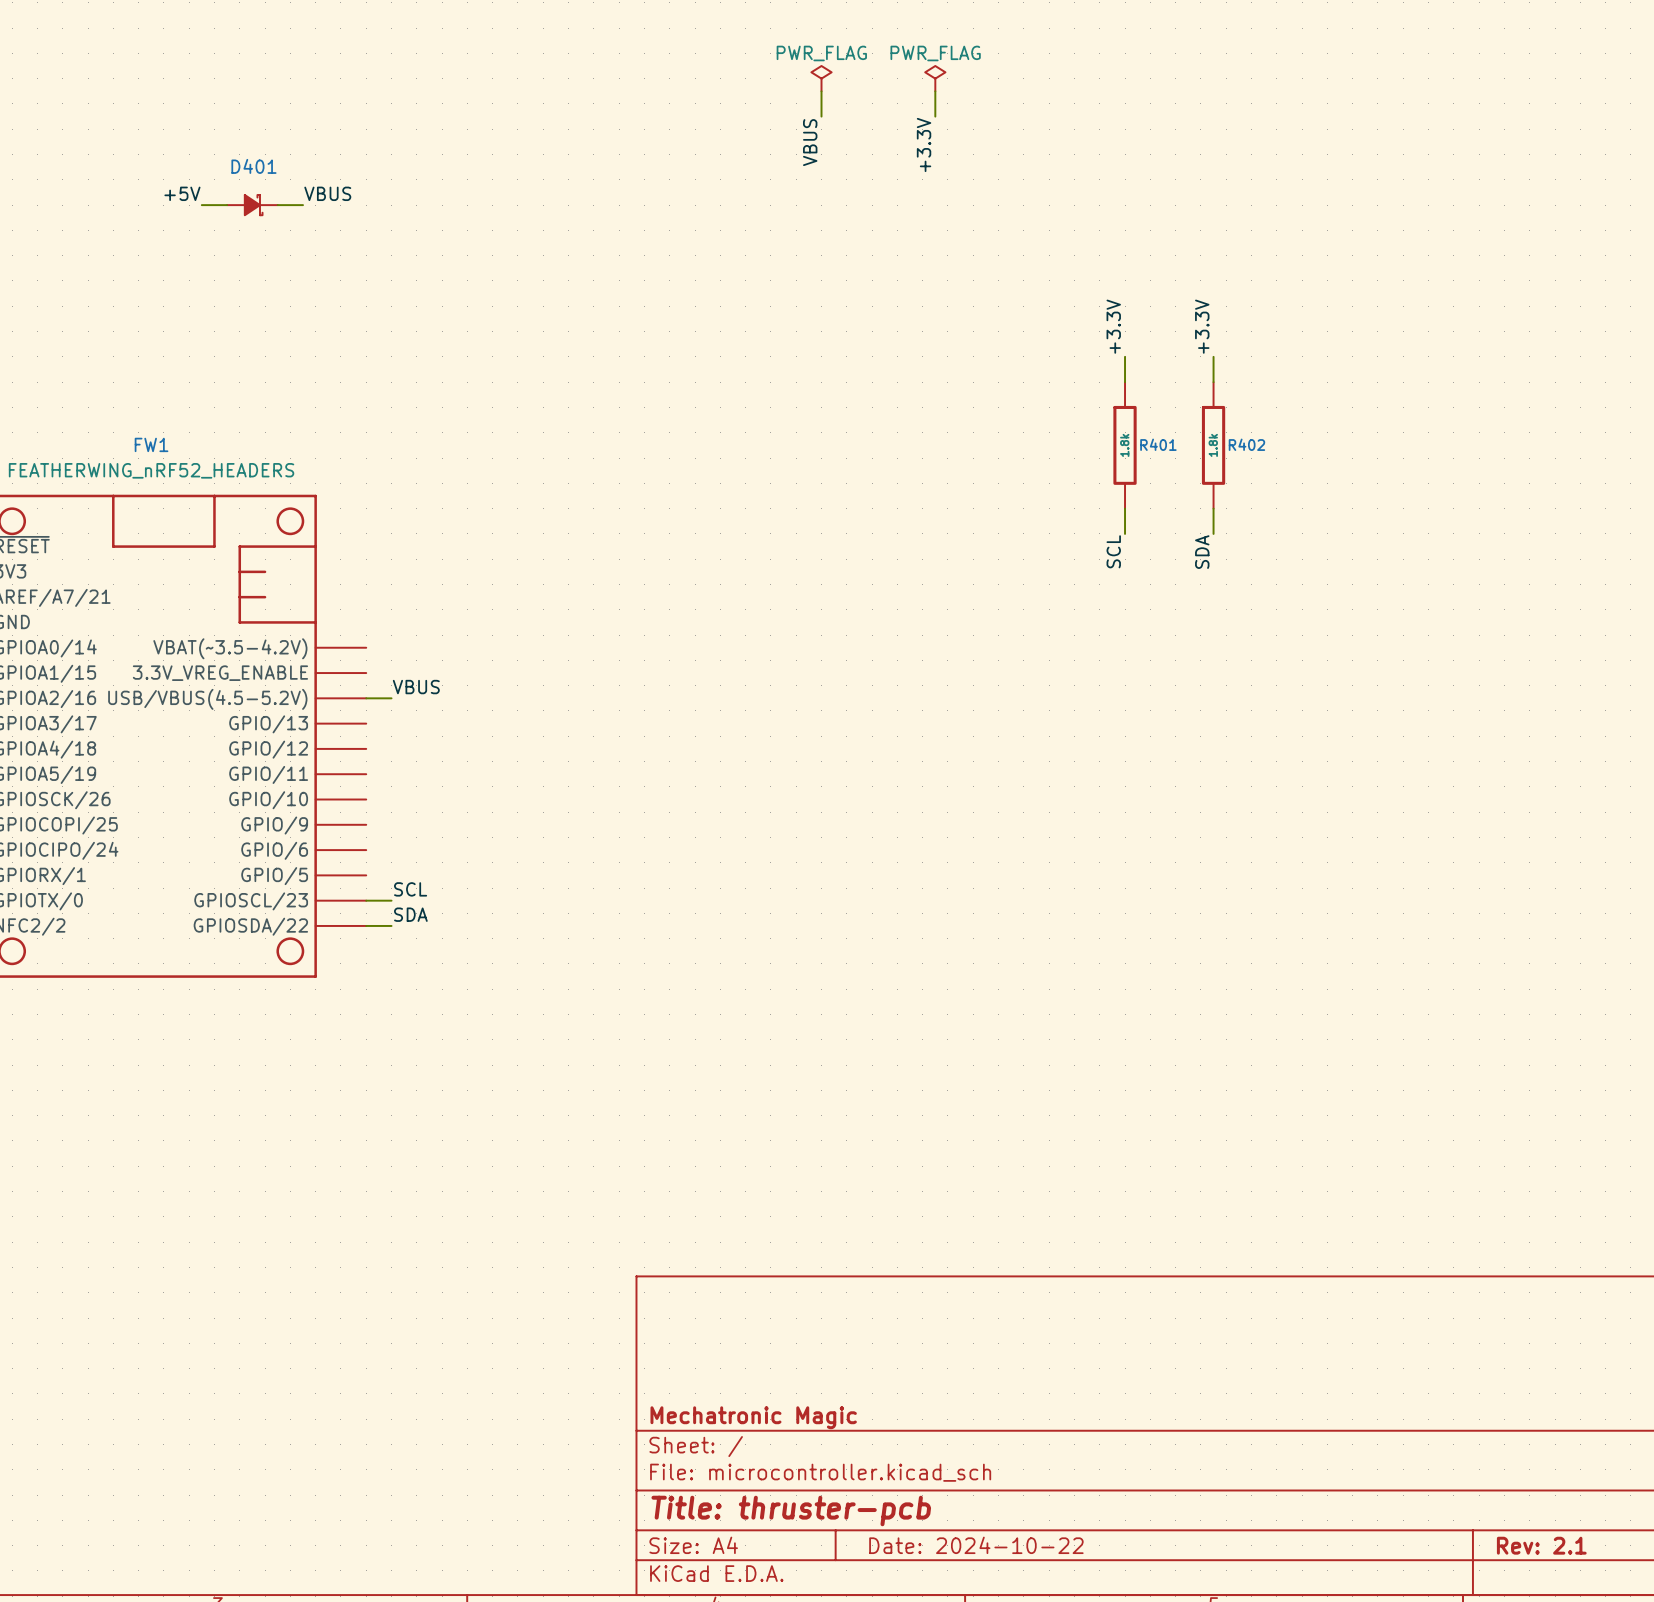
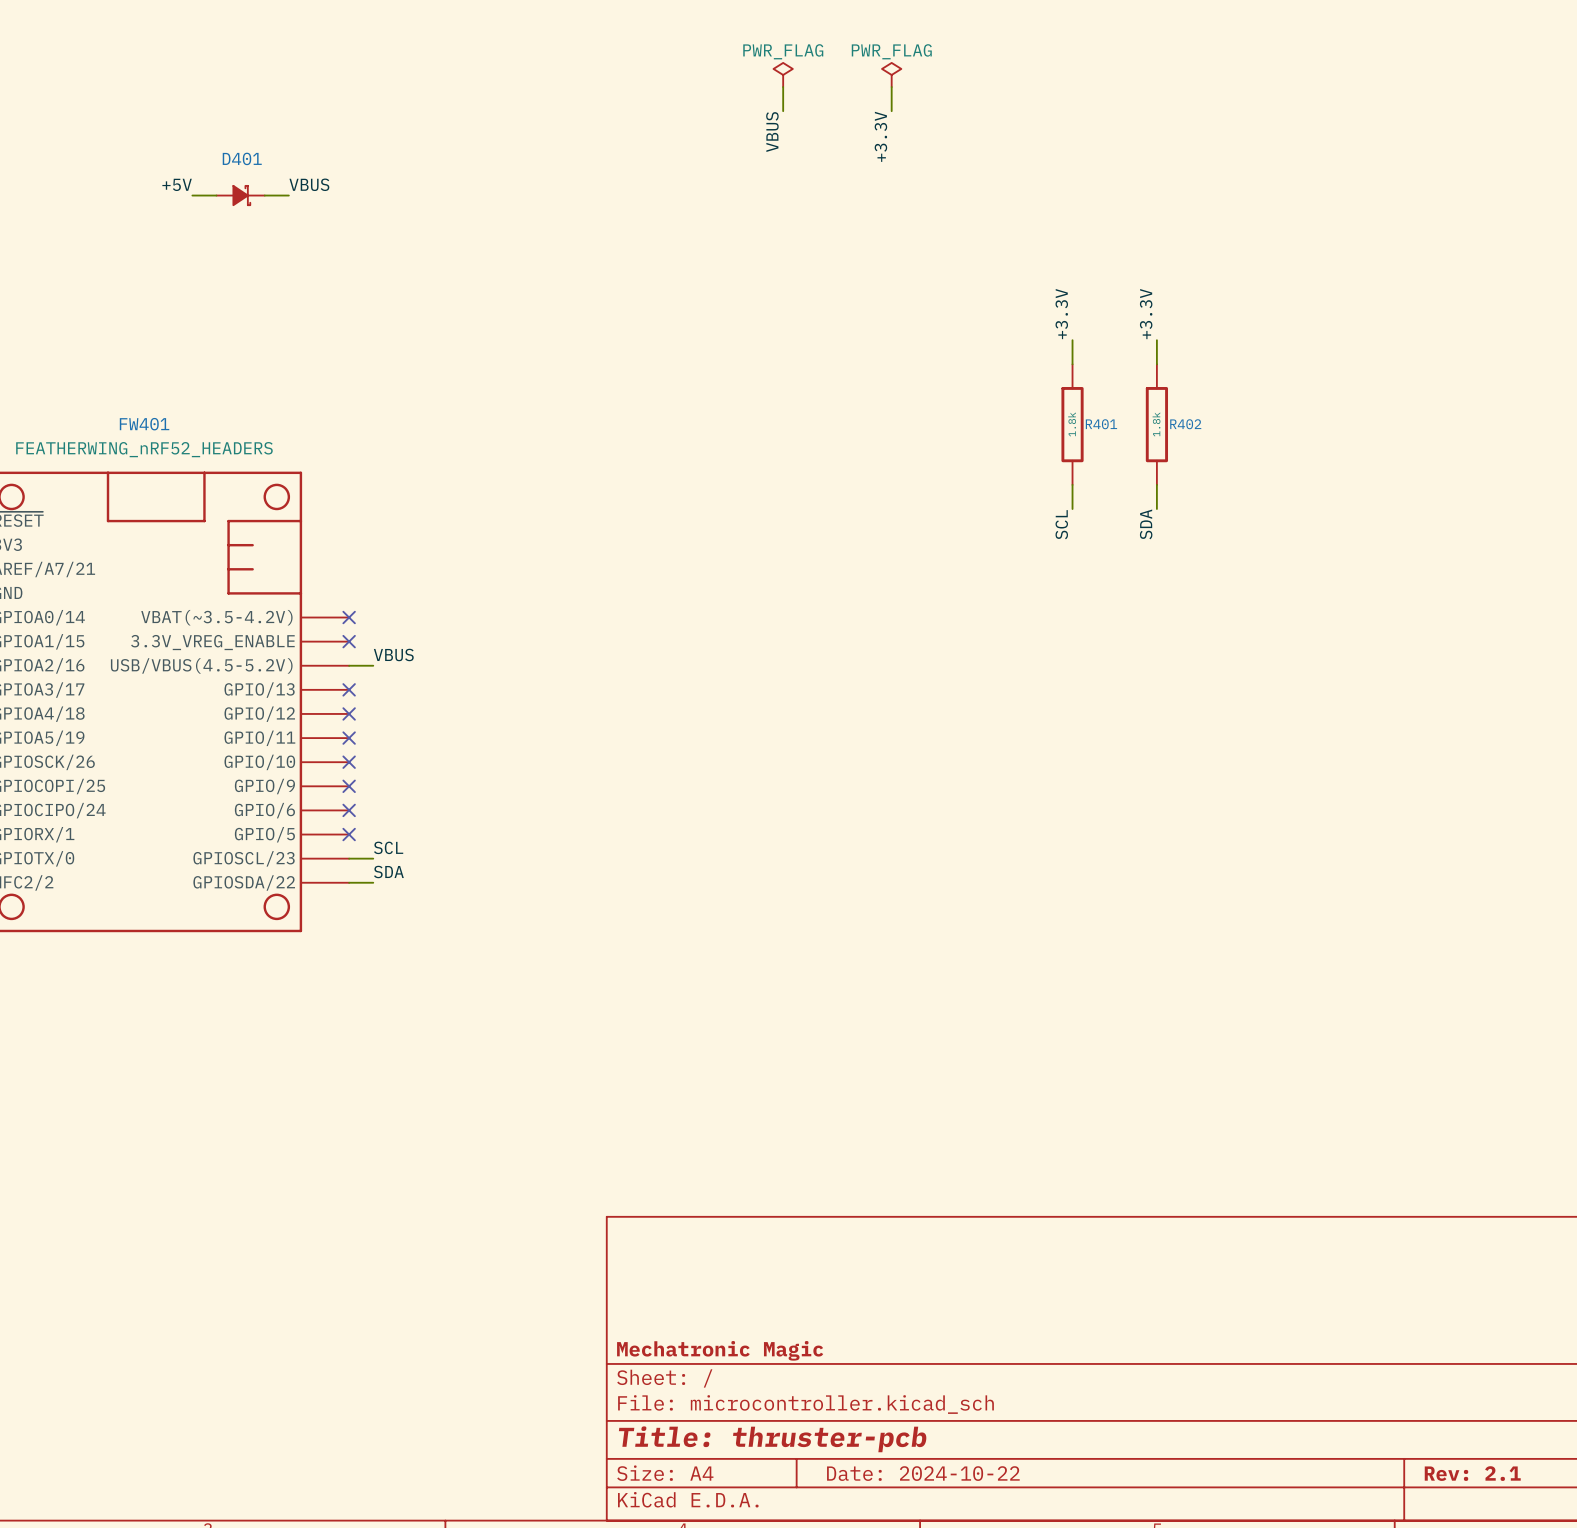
FW1 name: FW1 (151, 444) -> FW401 (144, 424)
no-connect mark: none -> (349, 617)
no-connect mark: none -> (349, 641)
no-connect mark: none -> (349, 689)
no-connect mark: none -> (349, 713)
no-connect mark: none -> (349, 738)
no-connect mark: none -> (349, 762)
no-connect mark: none -> (349, 786)
no-connect mark: none -> (349, 810)
no-connect mark: none -> (349, 834)

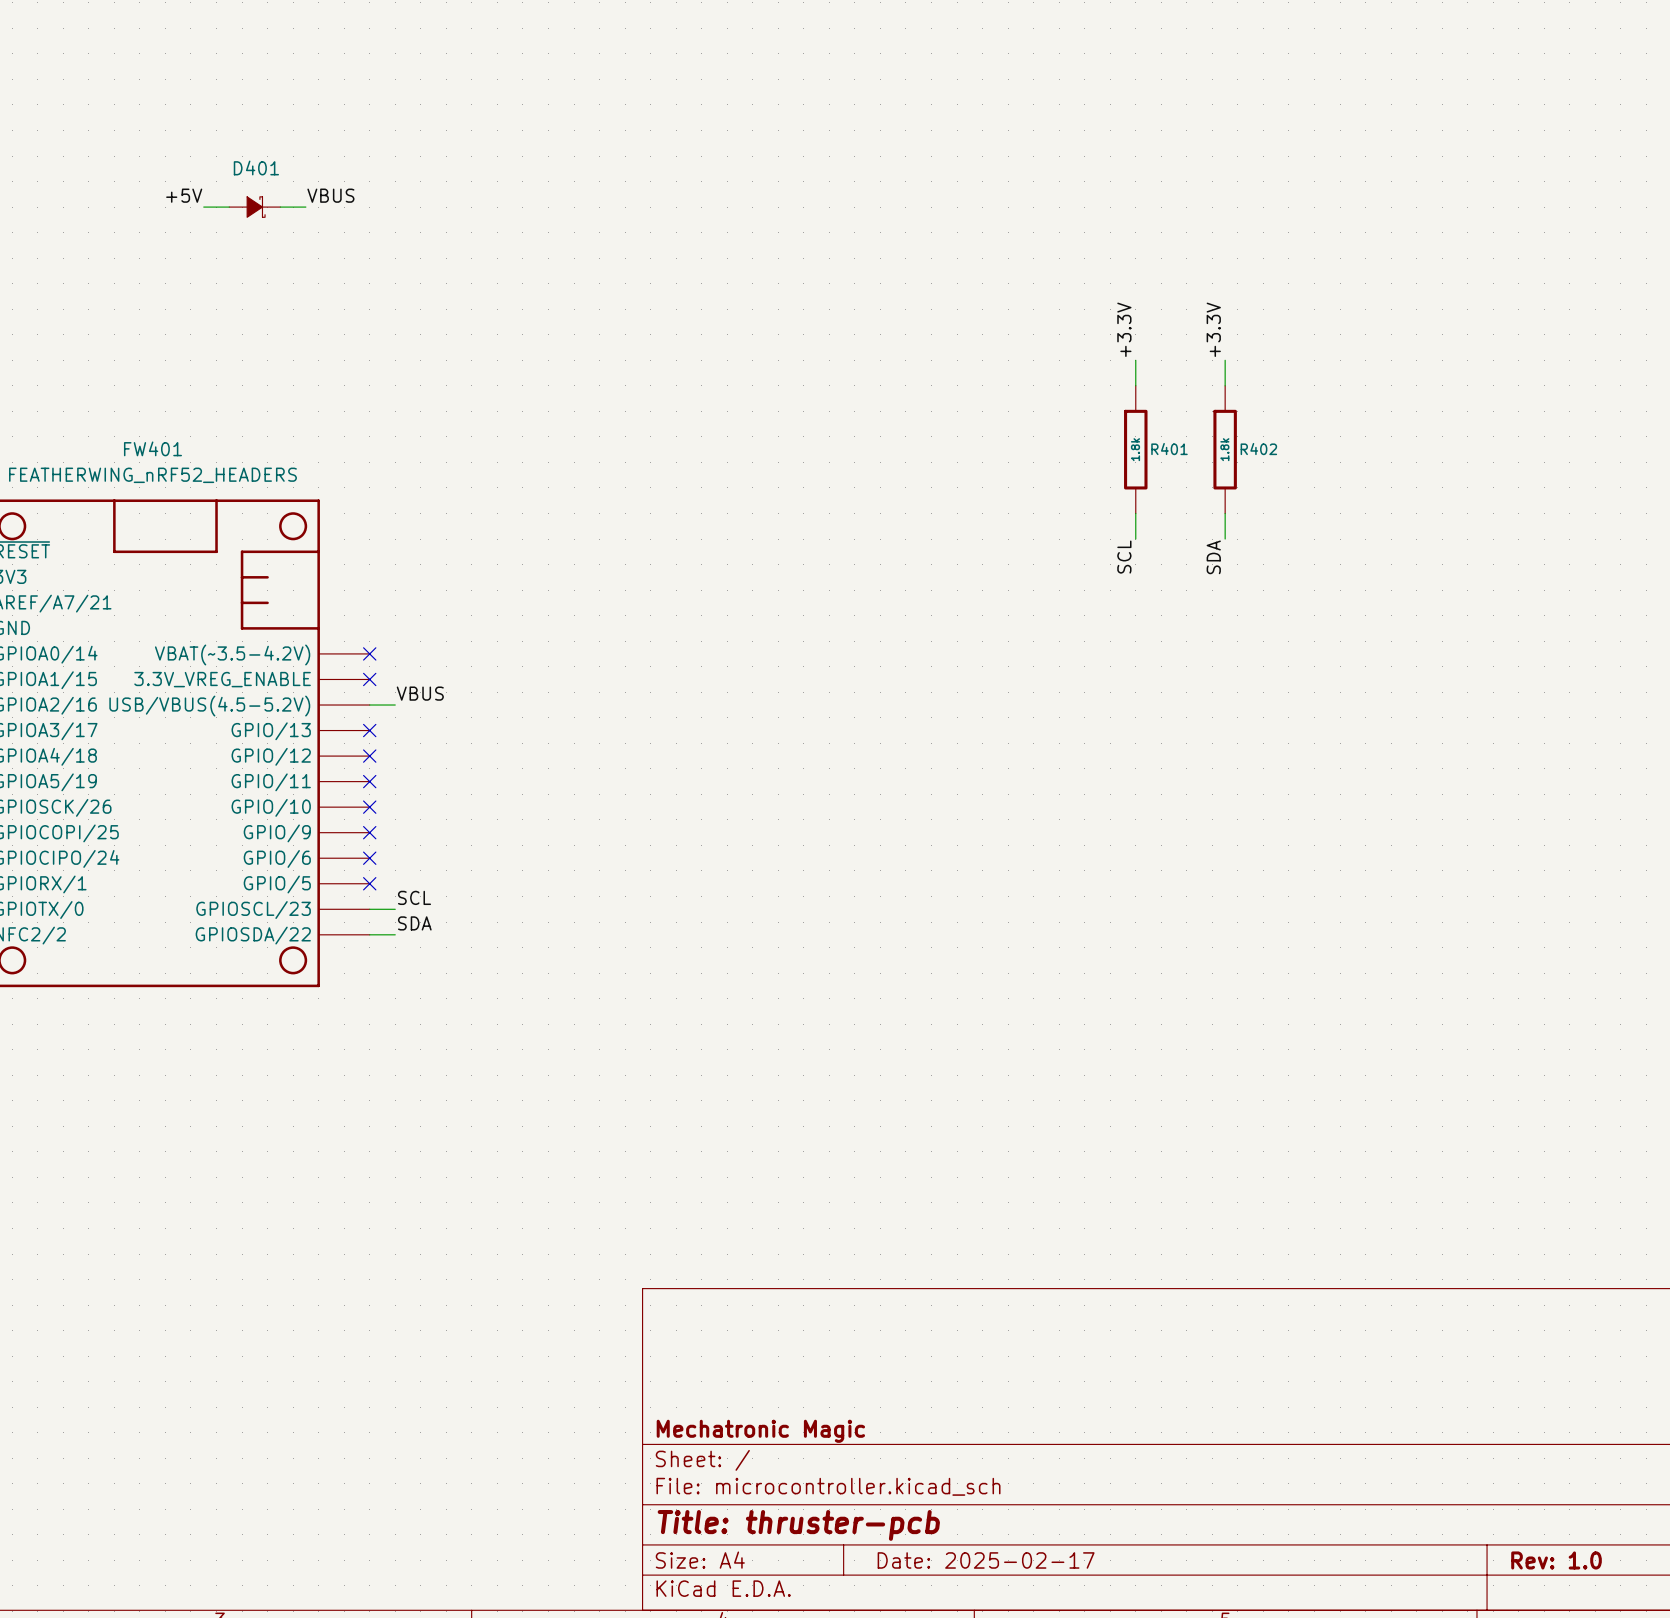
power symbol: PWR_FLAG (783, 74) -> none
power symbol: PWR_FLAG (891, 74) -> none
wire: (783, 87) (783, 111) -> none
wire: (891, 87) (891, 111) -> none
label: VBUS (772, 132) -> none
label: +3.3V (880, 136) -> none
title block: Date: 2024-10-22 (923, 1473) -> Date: 2025-02-17 (986, 1560)
title block: Rev: 2.1 (1472, 1473) -> Rev: 1.0 (1556, 1560)

